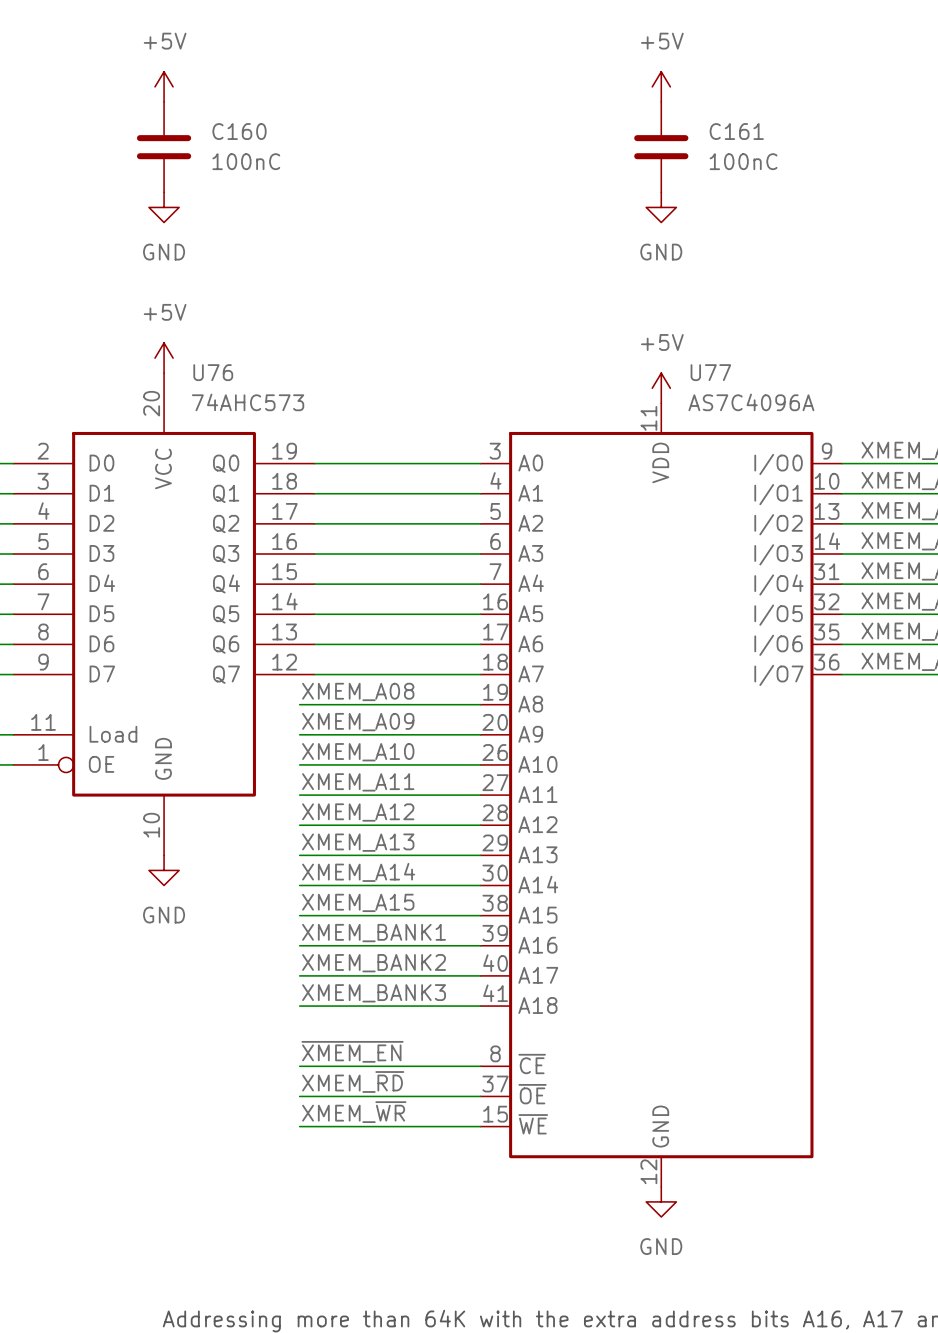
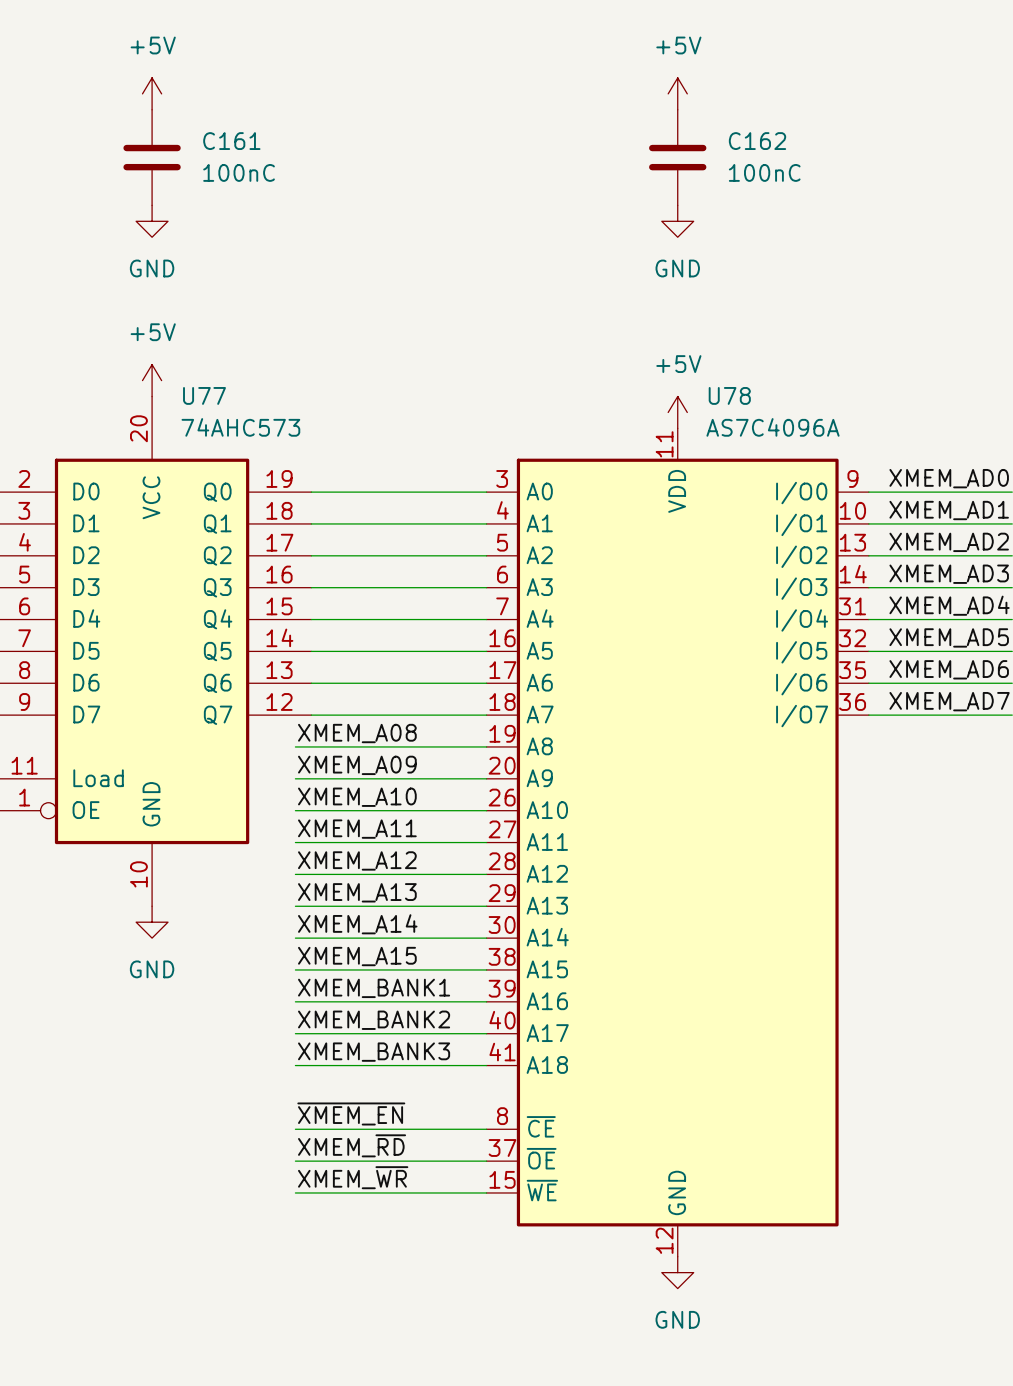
C160 name: C160 (239, 131) -> C161 (231, 141)
C161 name: C161 (736, 131) -> C162 (757, 141)
U76 name: U76 (213, 372) -> U77 (204, 395)
U77 name: U77 (710, 372) -> U78 (729, 395)

